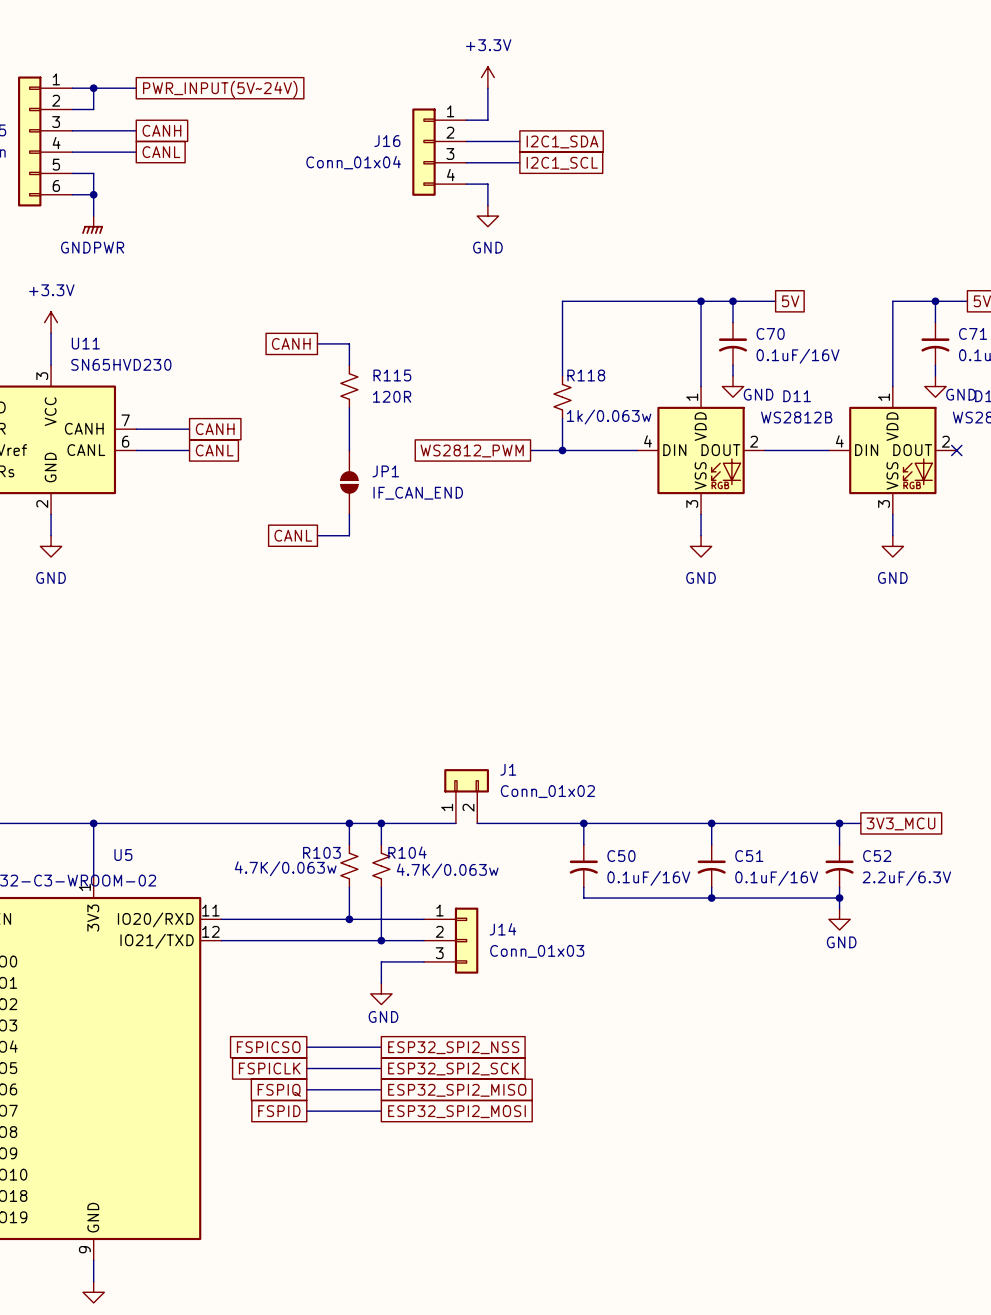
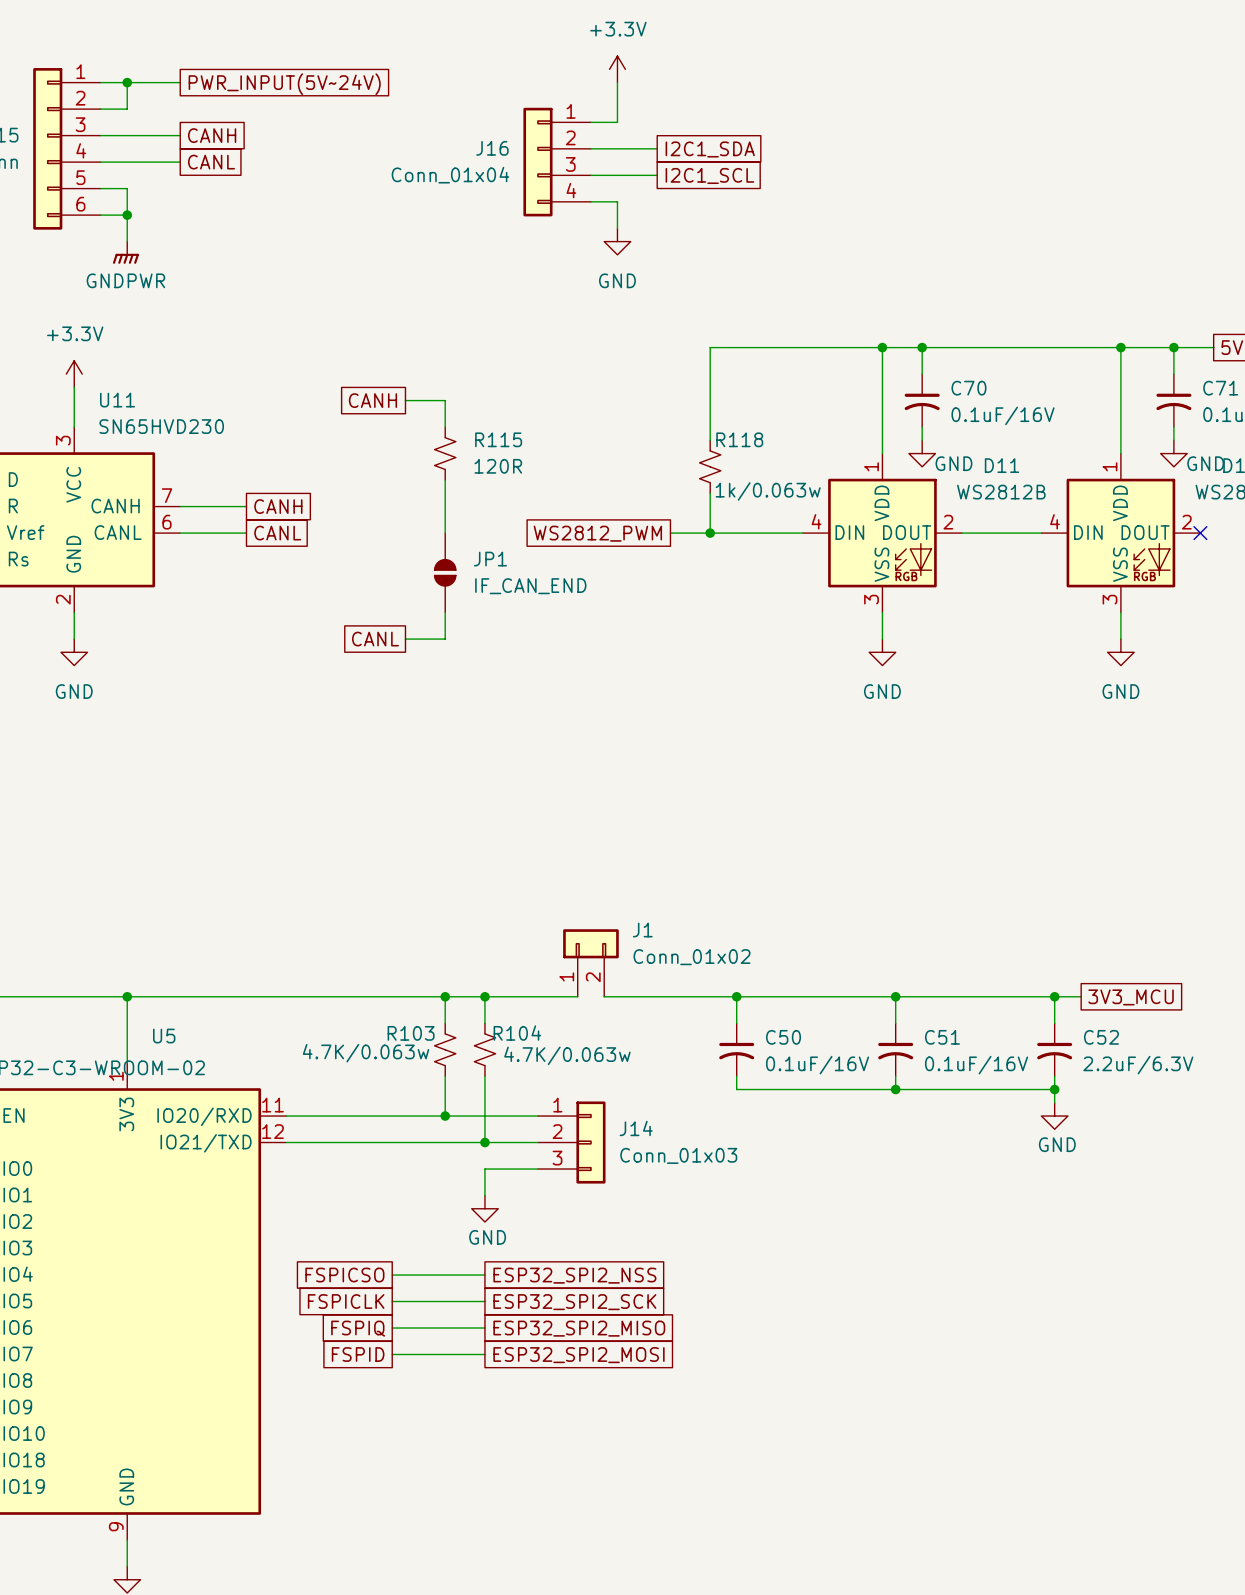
wire: none -> (975, 347) (1120, 347)
global label: 5V (790, 301) -> none
junction: none -> (1120, 347)

